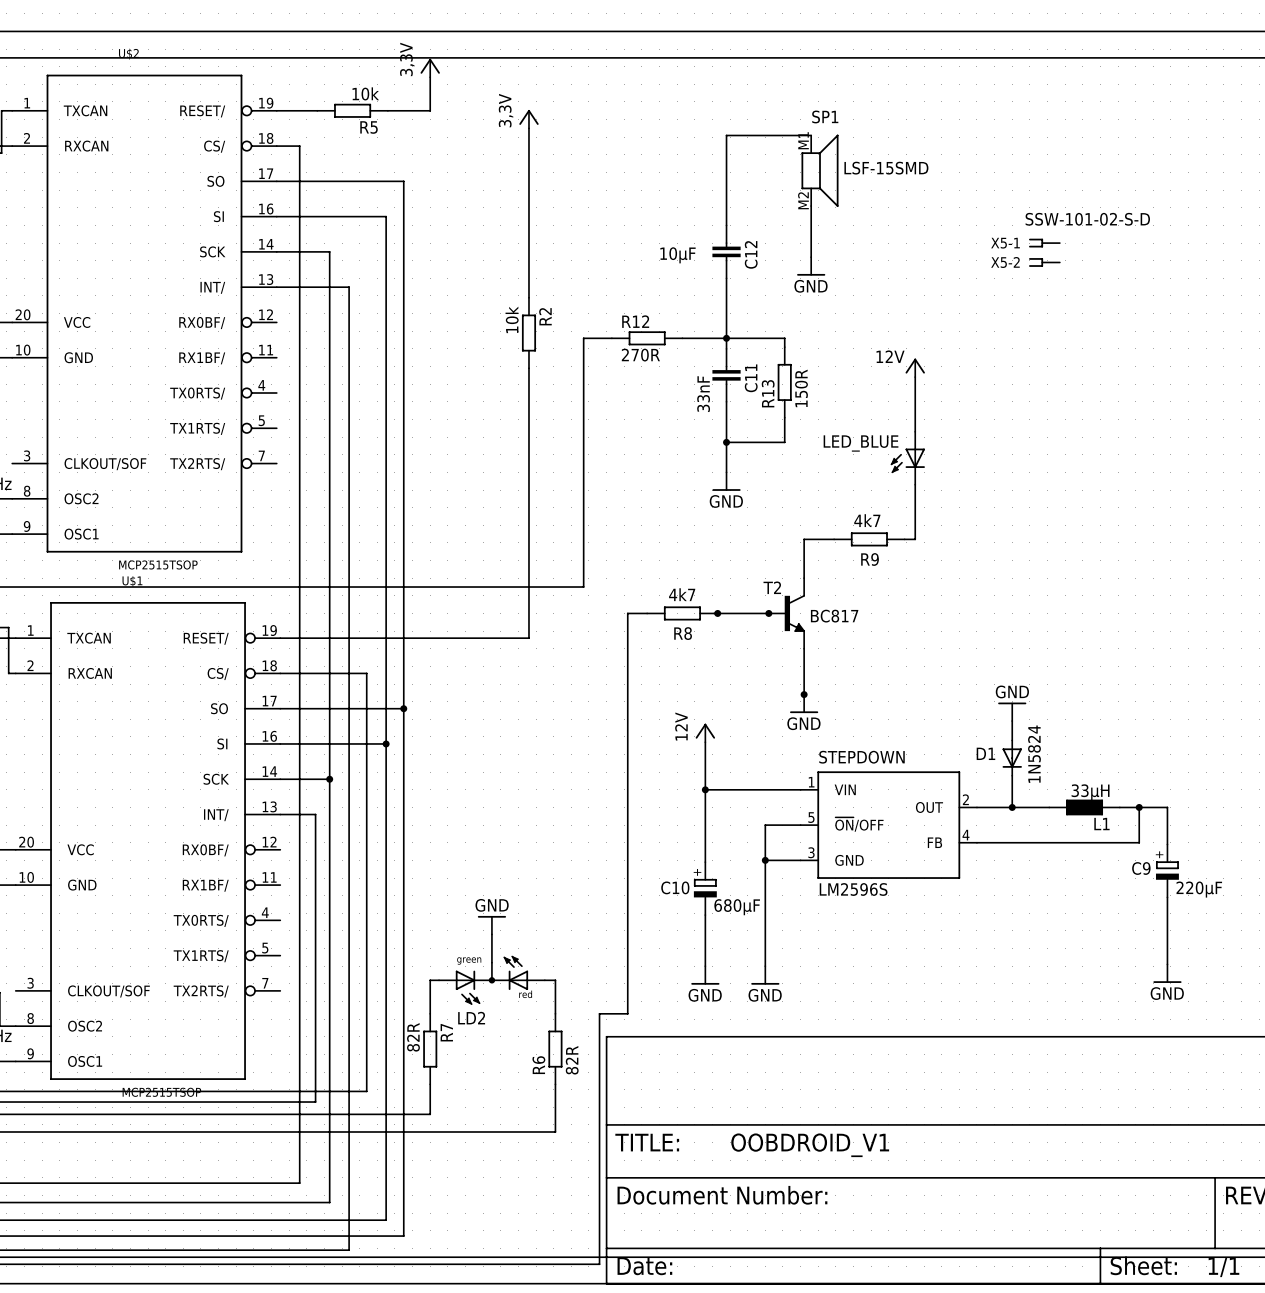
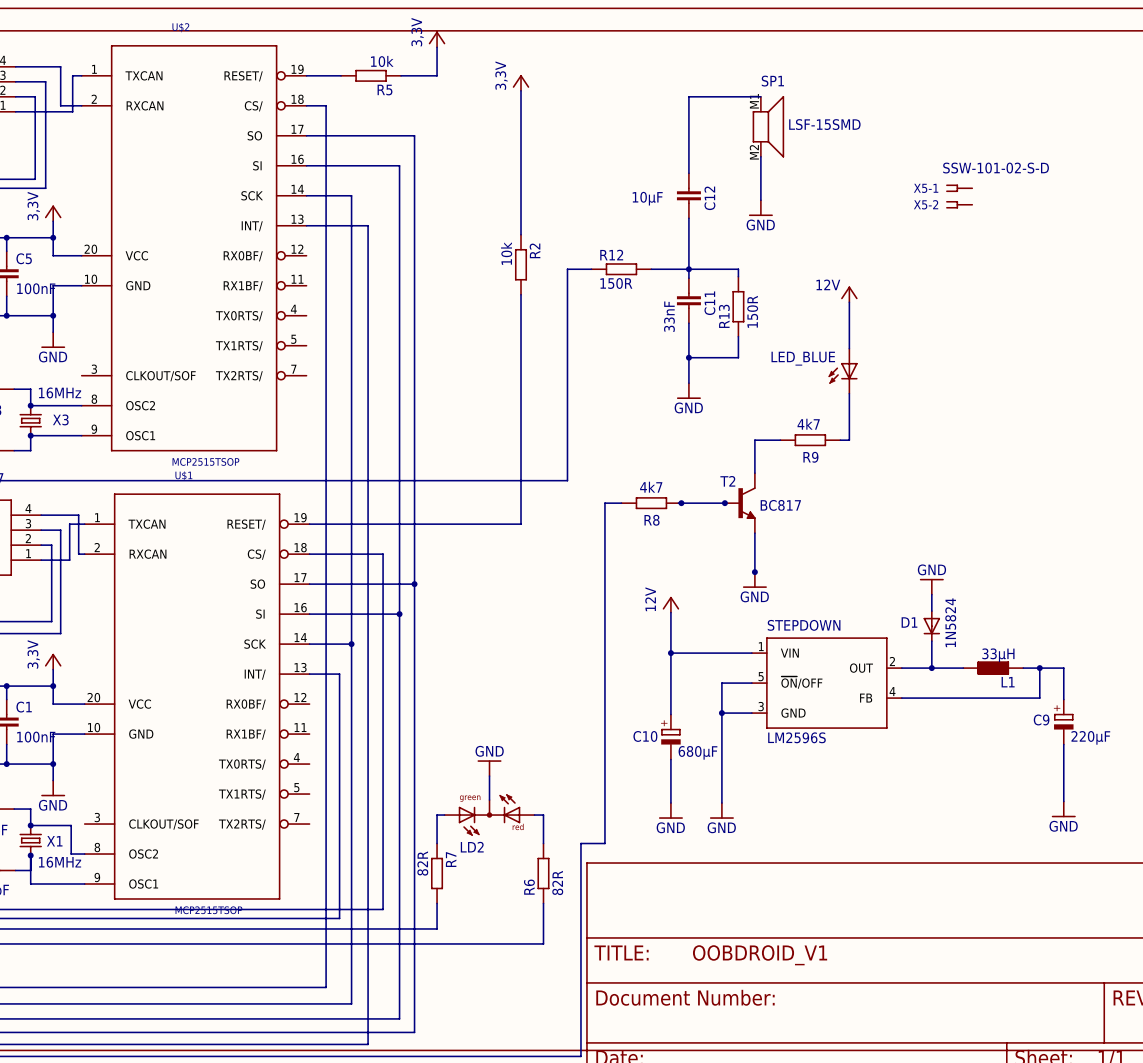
R12 value: 270R (640, 355) -> 150R (616, 283)

